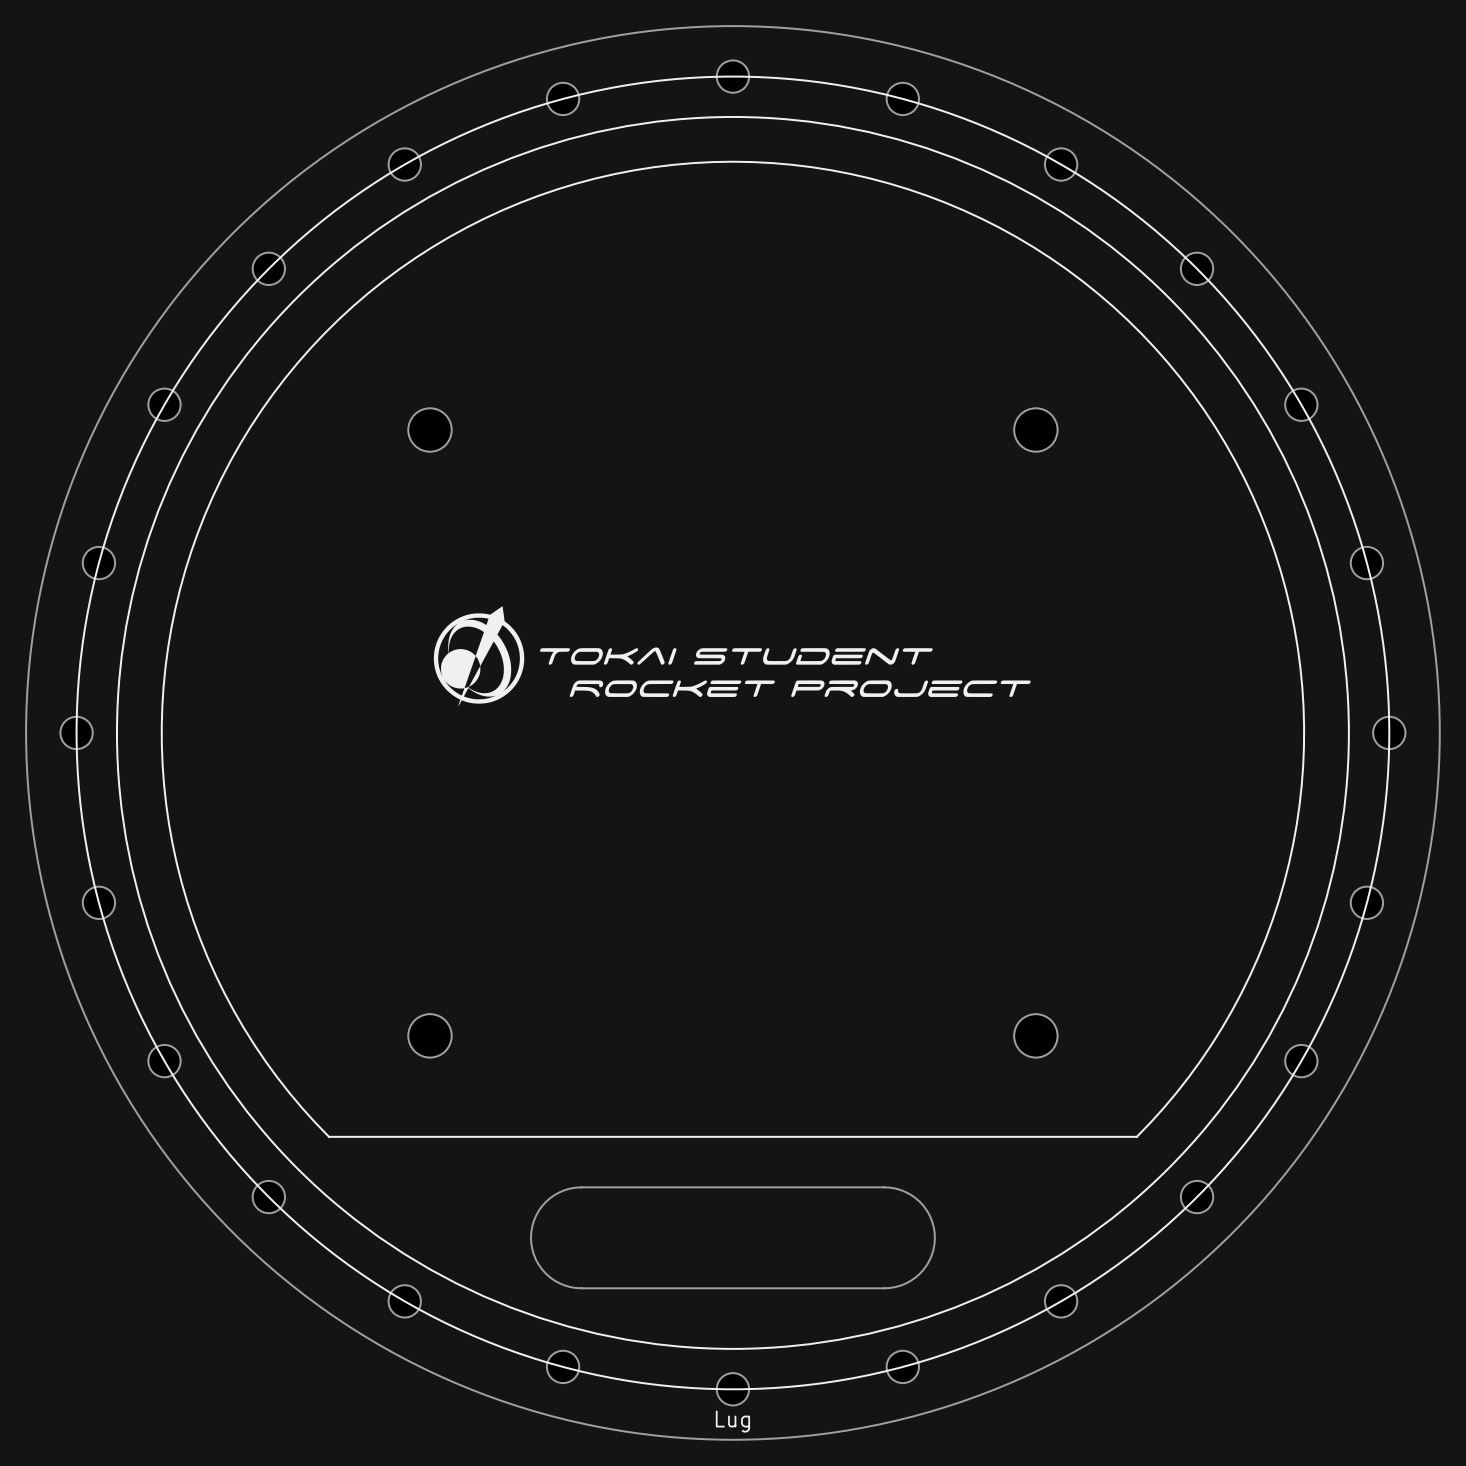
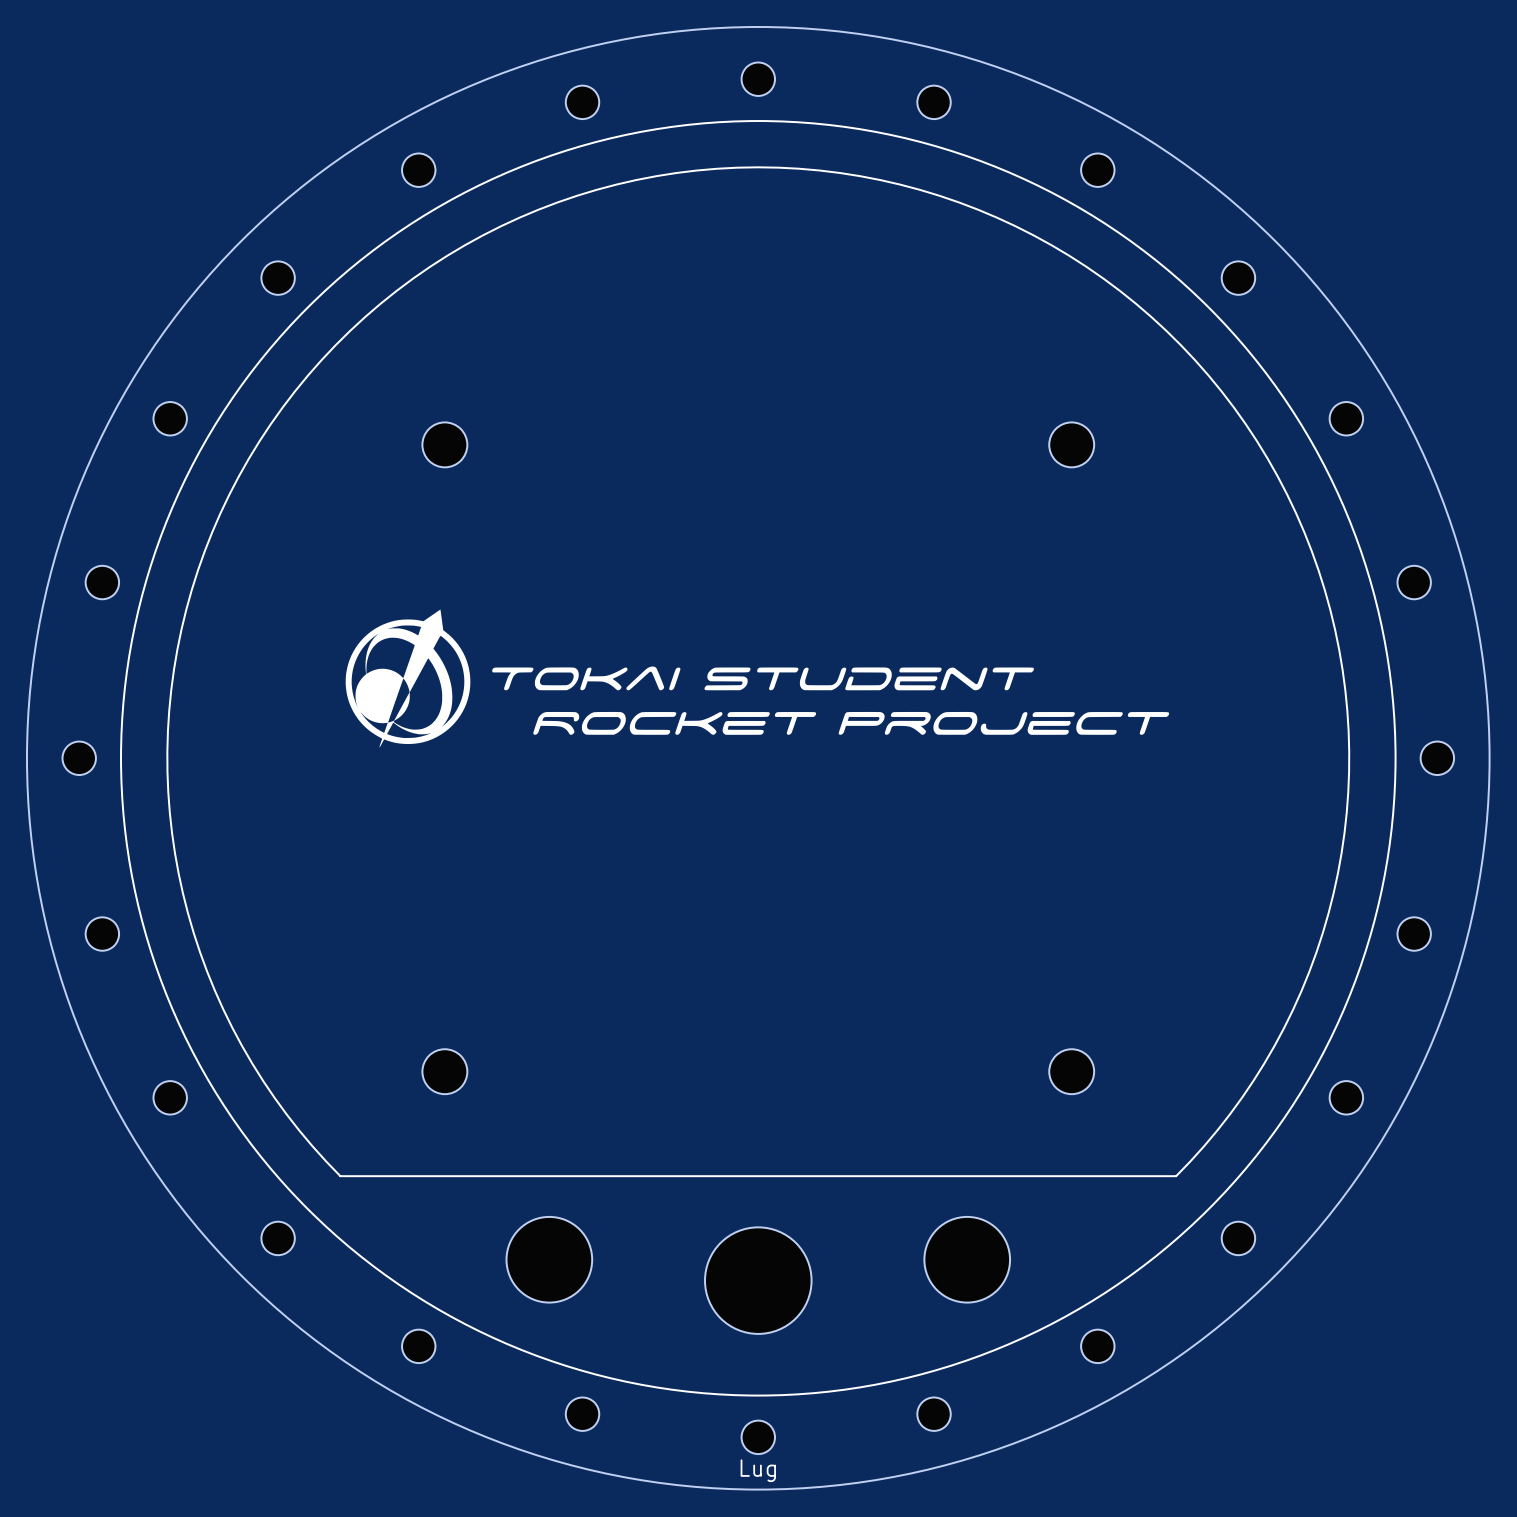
drawing: [76, 76, 1390, 1390] -> none
drawing shape: [433, 606, 1031, 706] -> [345, 609, 1170, 748]
board edge: (581, 1187) (890, 1187) (906, 1192) (923, 1206) (932, 1221) (934, 1243) (929, 1259) (920, 1273) (906, 1283) (890, 1287) (575, 1287) (559, 1283) (545, 1273) (533, 1254) (530, 1237) (535, 1215) (545, 1202) (559, 1192) (581, 1187) -> none
part: none -> (549, 1259)
part: none -> (967, 1259)
part: none -> (758, 1280)

